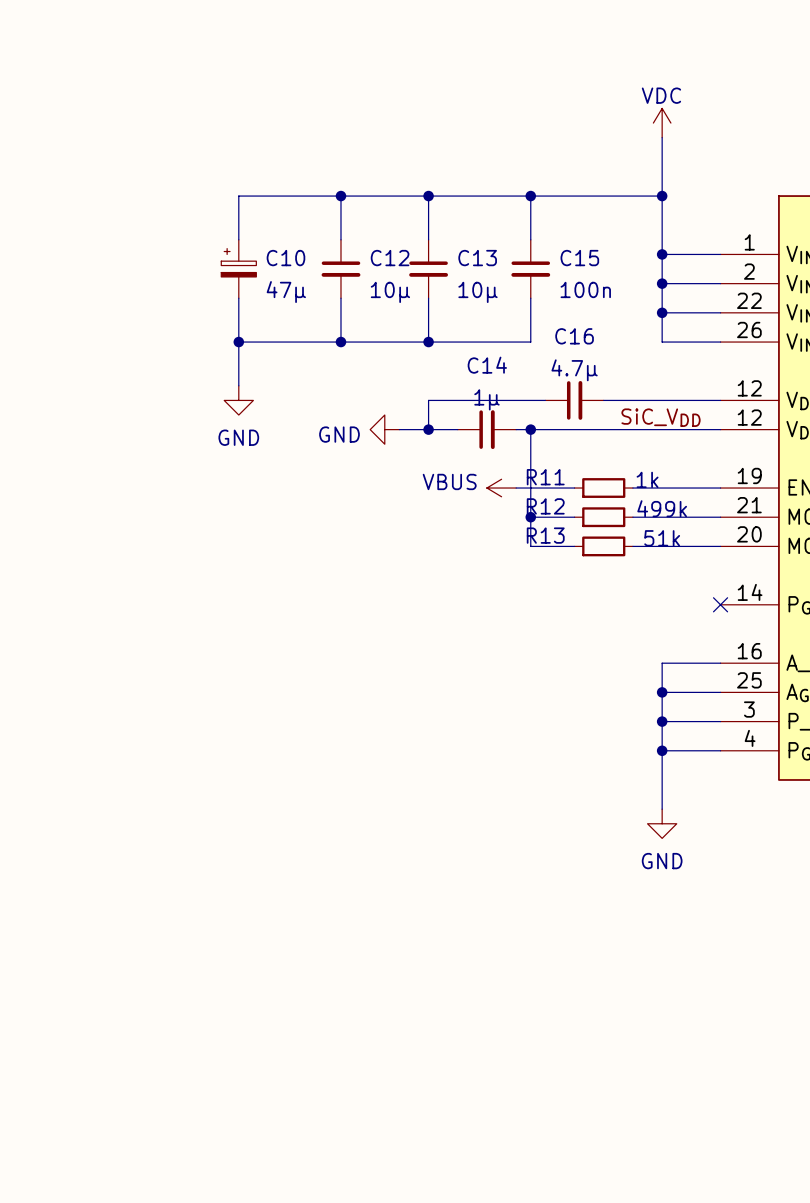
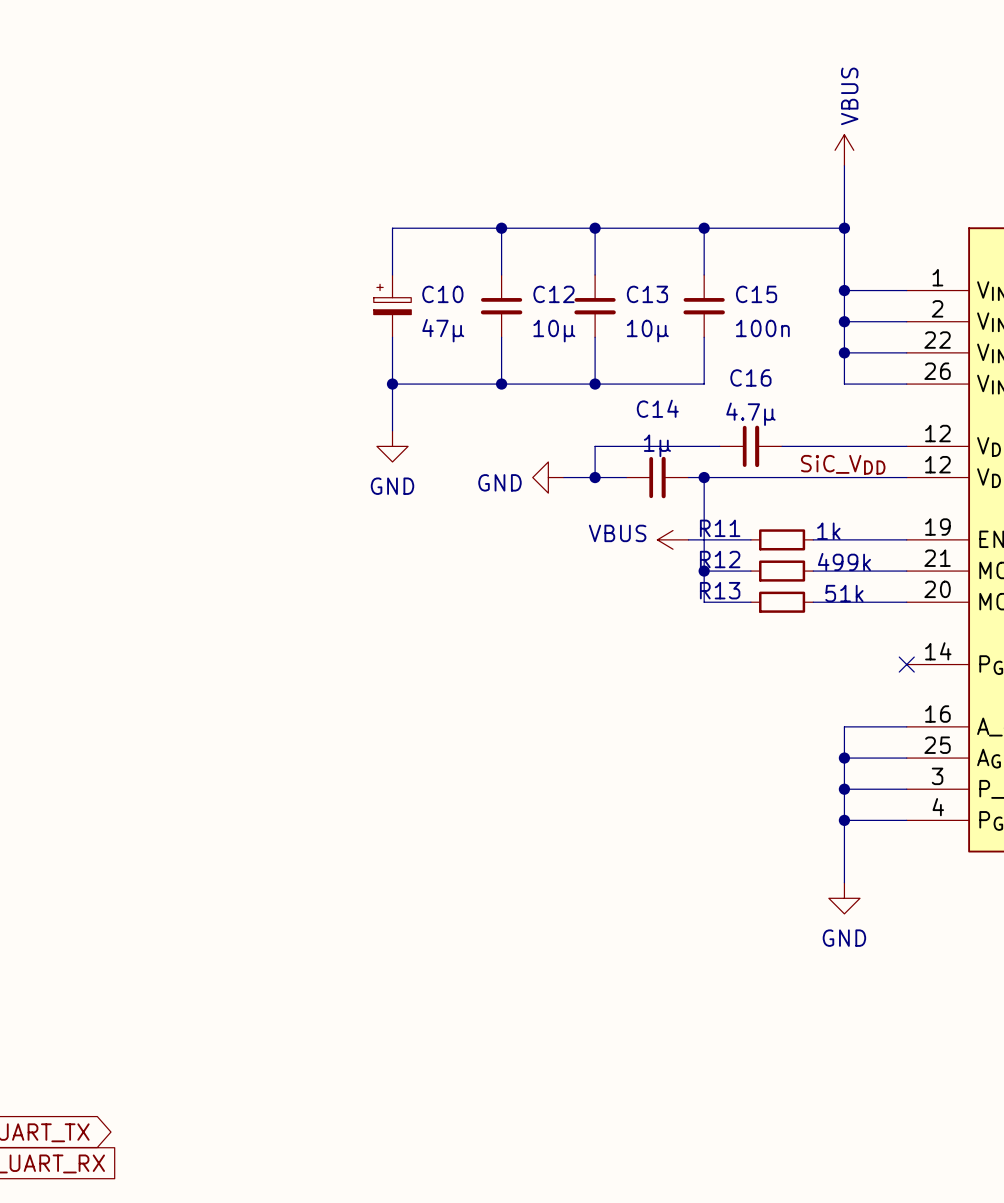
power symbol: VDC (662, 123) -> VBUS (844, 150)

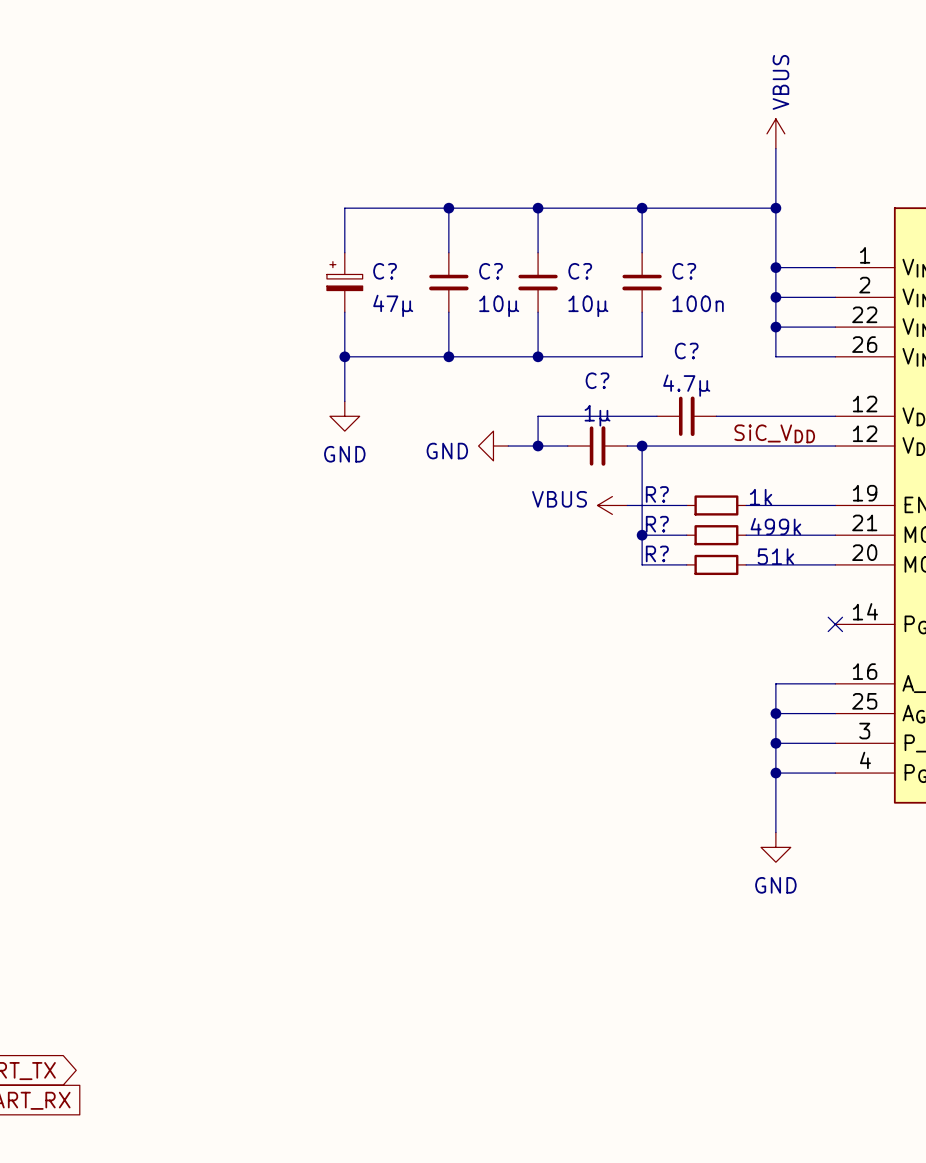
C10 name: C10 (442, 294) -> C? (385, 271)
C12 name: C12 (553, 294) -> C? (491, 271)
C13 name: C13 (647, 294) -> C? (580, 271)
C15 name: C15 (756, 294) -> C? (684, 271)
C16 name: C16 (750, 377) -> C? (686, 351)
C14 name: C14 (657, 408) -> C? (597, 380)
R11 name: R11 (720, 528) -> R? (657, 494)
R12 name: R12 (720, 559) -> R? (657, 524)
R13 name: R13 (720, 590) -> R? (657, 553)

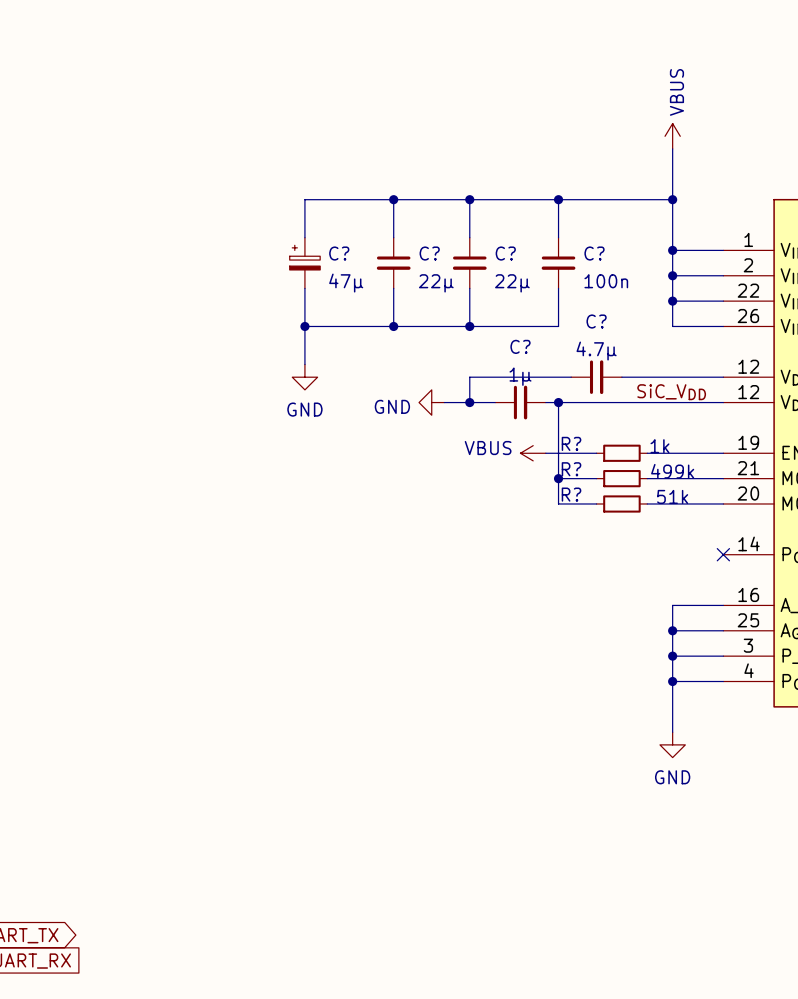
C? value: 10µ (499, 306) -> 22µ (436, 283)
C? value: 10µ (588, 306) -> 22µ (512, 283)

